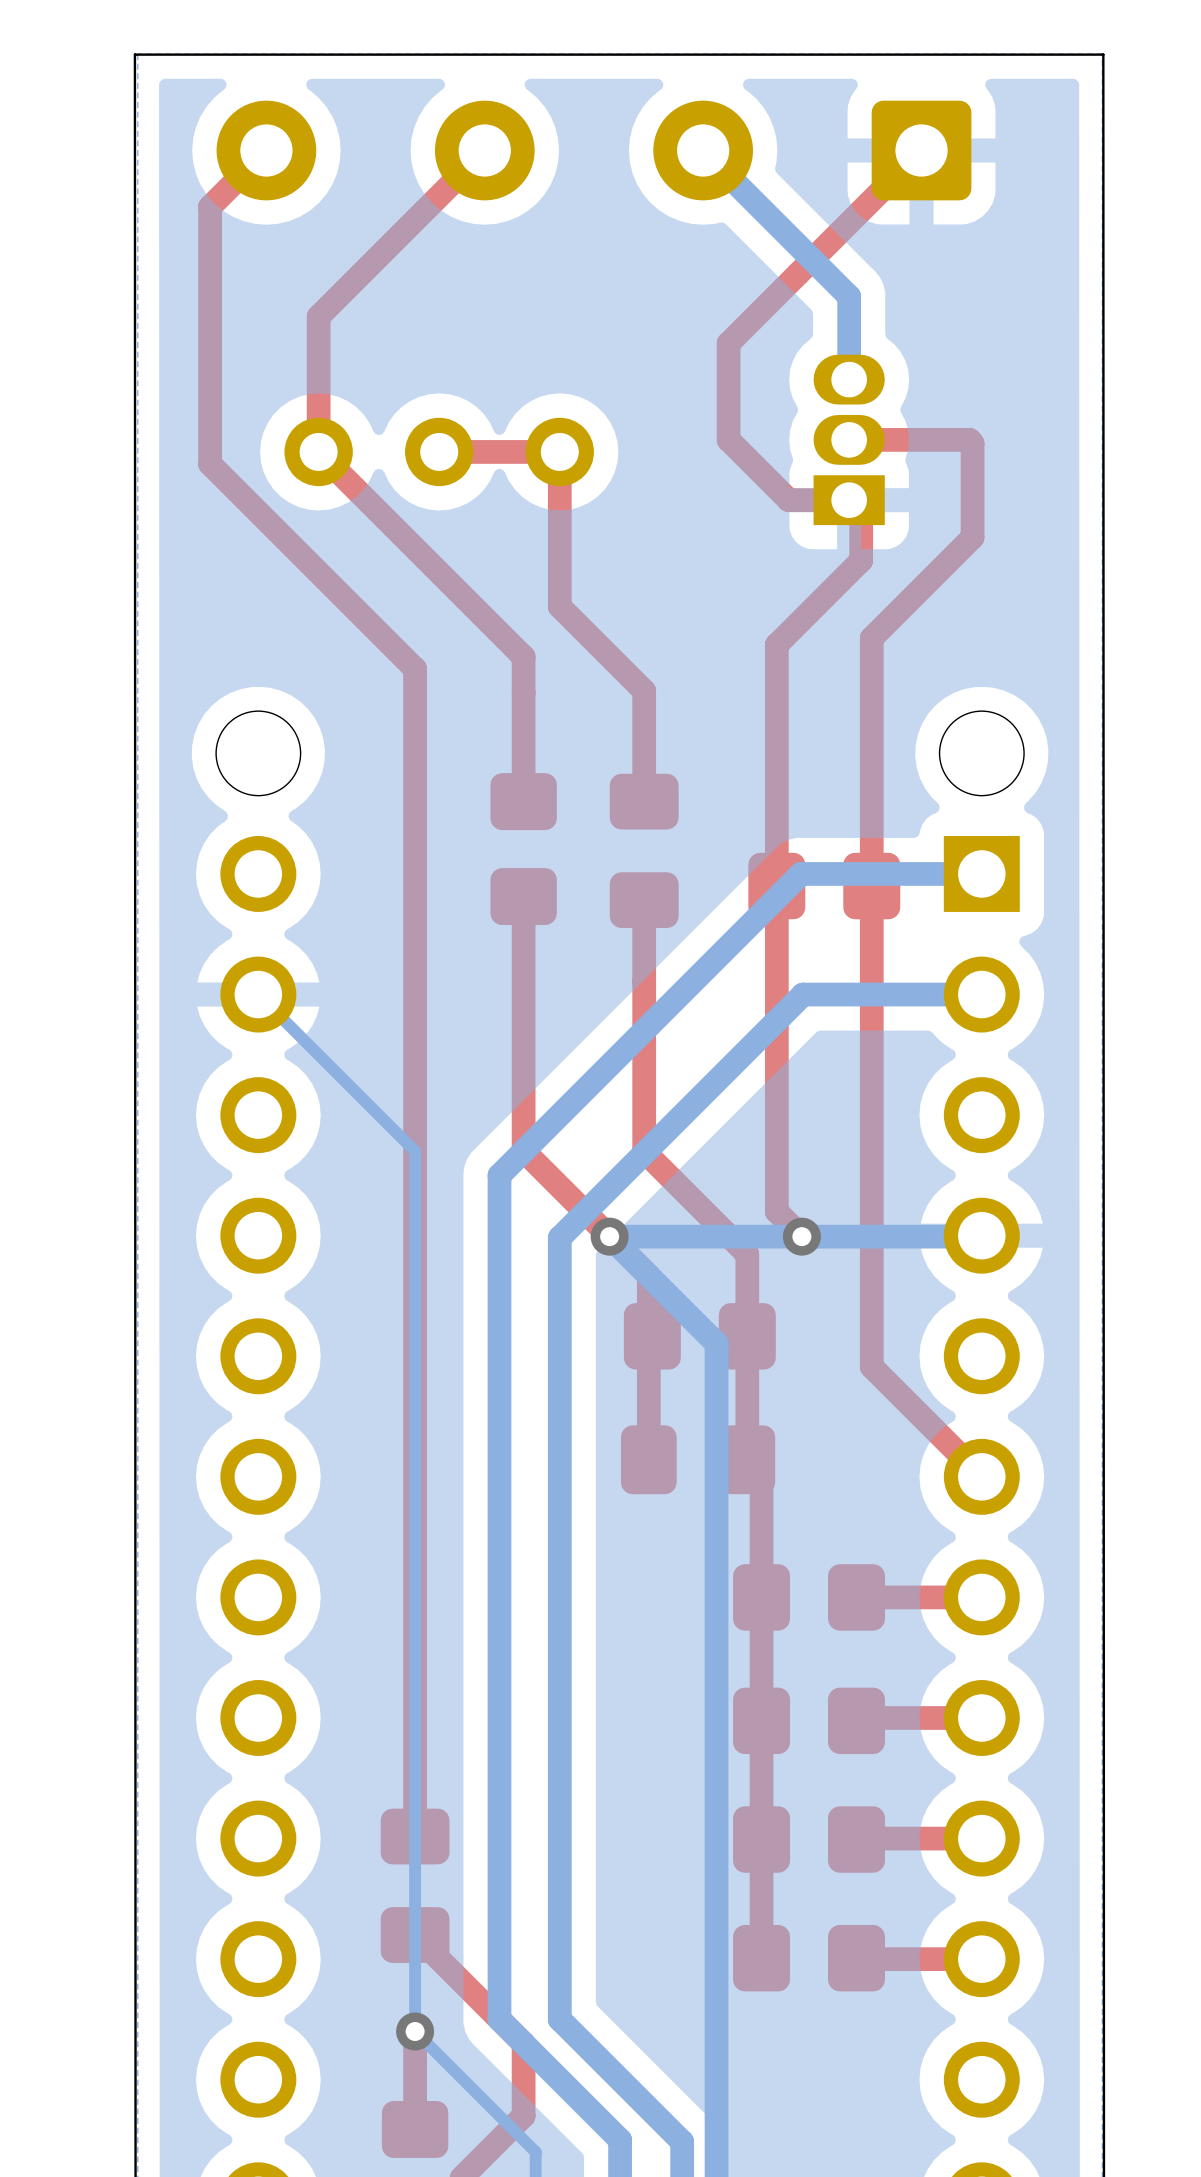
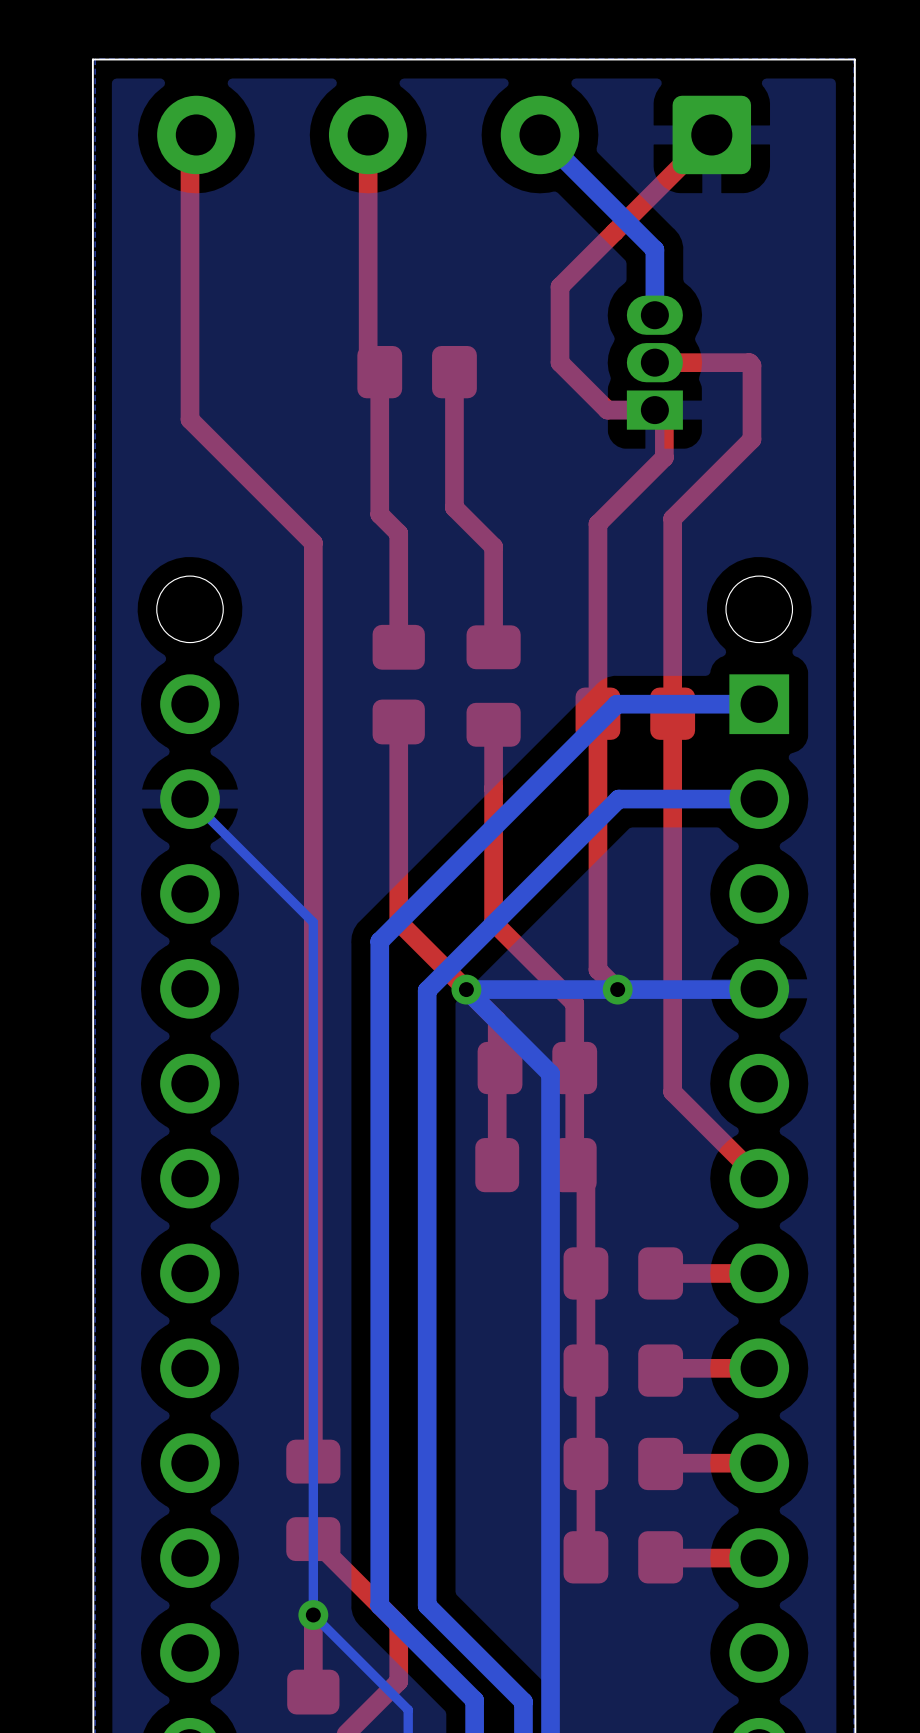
top track: (484, 150) (318, 316) (318, 451) (499, 632) -> (368, 134) (368, 360) (379, 372) (379, 514)
top track: (258, 158) (210, 206) (210, 464) (258, 512) -> (190, 141) (190, 419)
top track: (439, 451) (559, 451) (559, 606) (644, 691) -> (454, 372) (454, 507) (493, 546) (493, 560)
part: (439, 451) -> none
part: none -> (417, 372)

